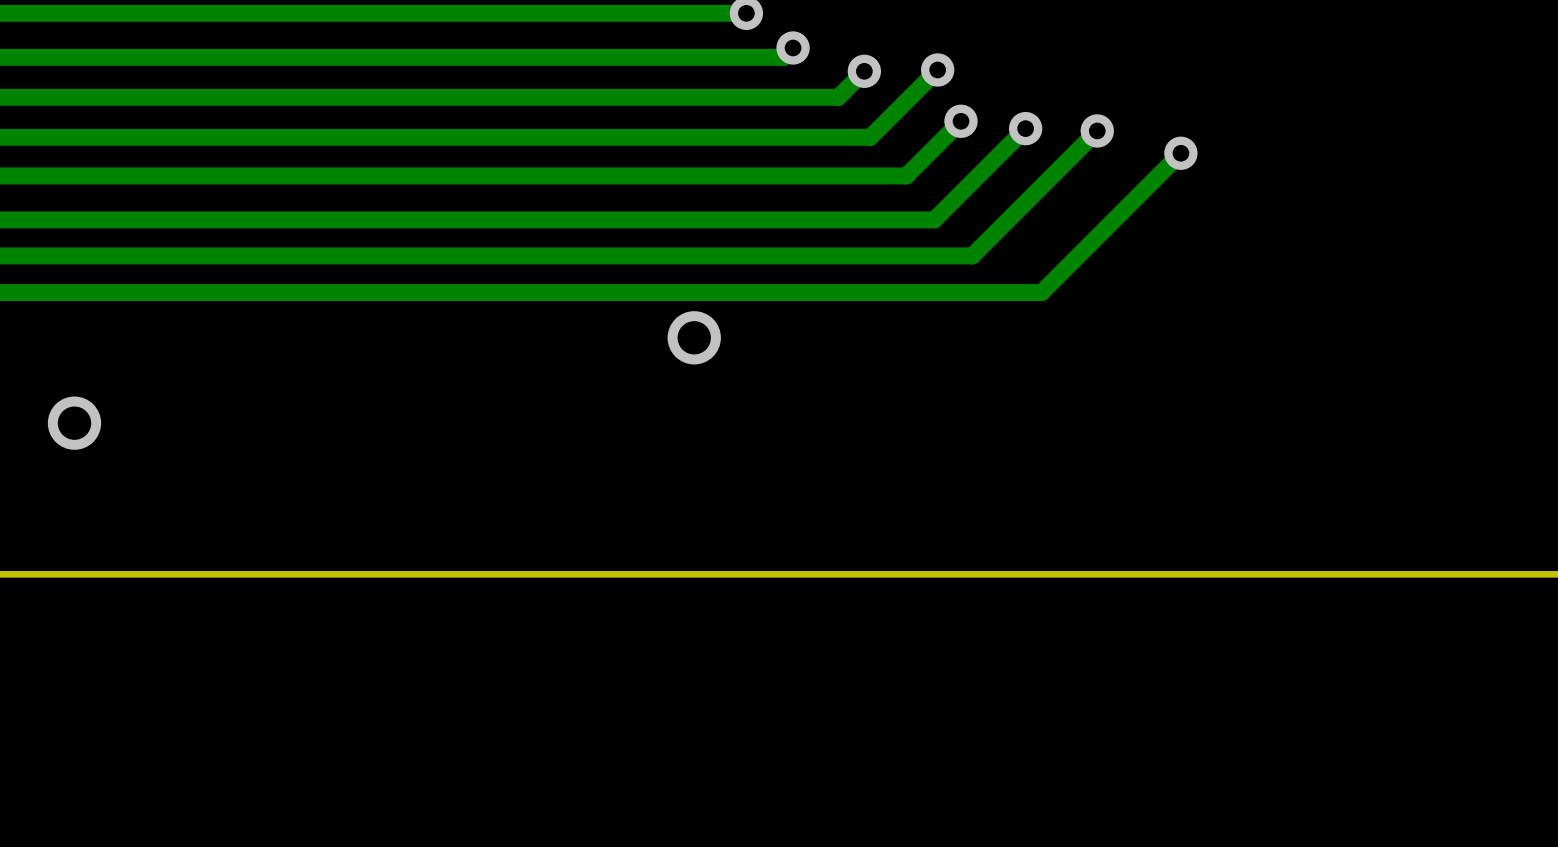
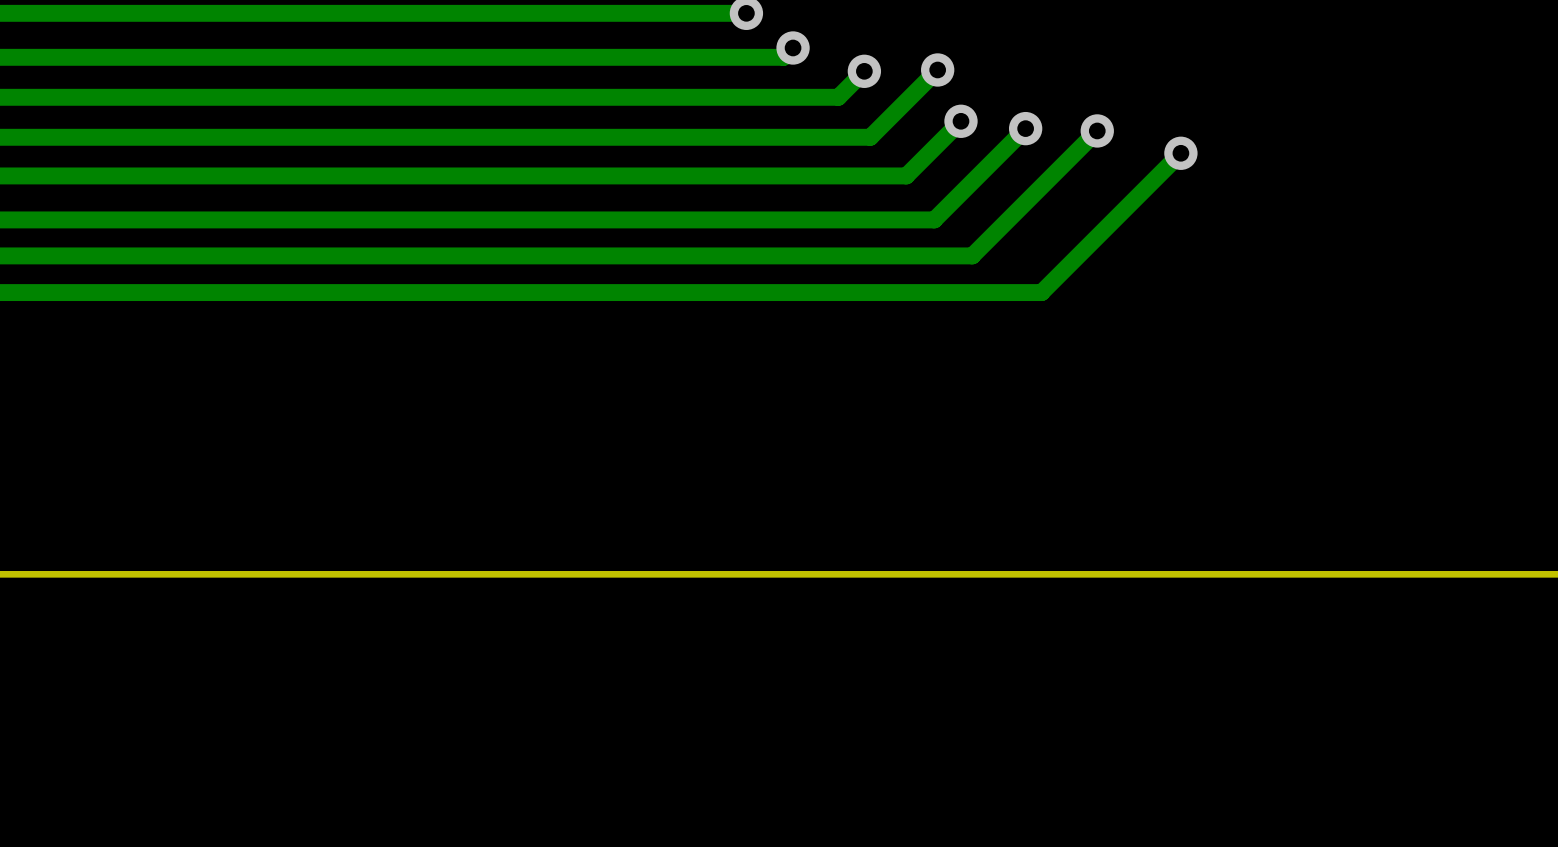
via: (694, 337) -> none
via: (74, 423) -> none

